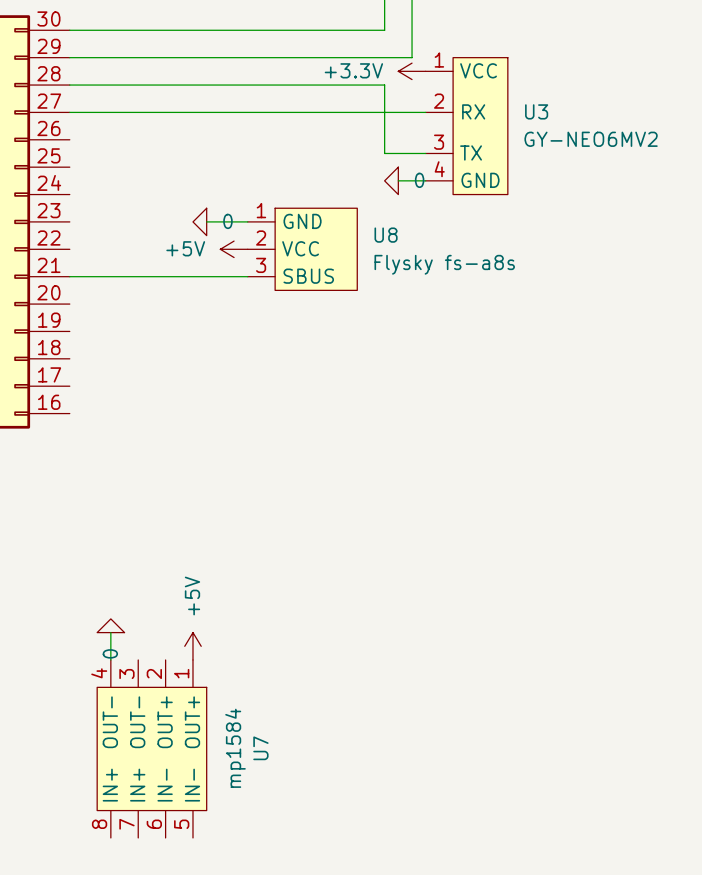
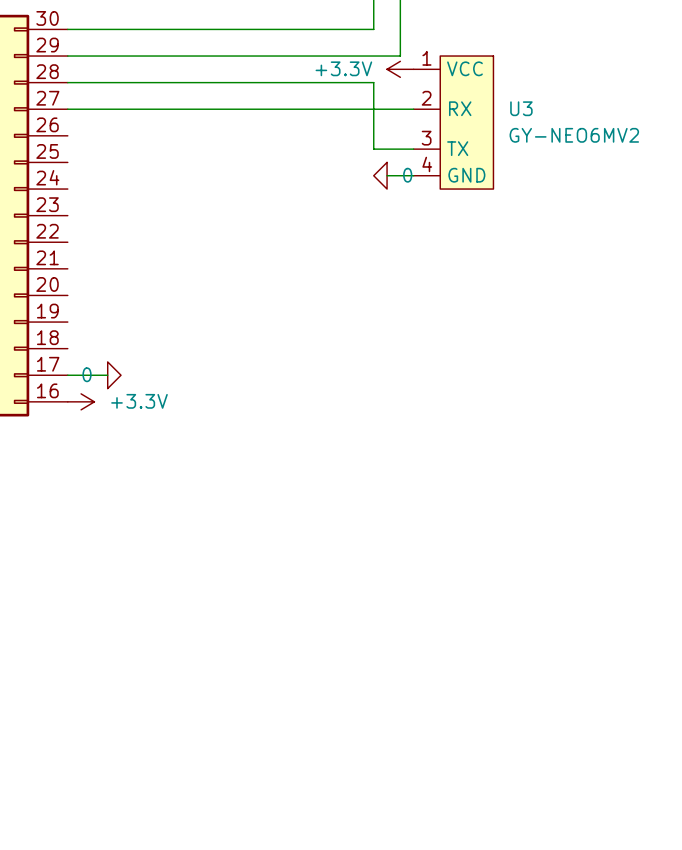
power symbol: 0 (199, 221) -> none
wire: (206, 221) (247, 221) -> (67, 375) (107, 375)
power symbol: +5V (234, 249) -> none
U8: Flysky fs-a8s (302, 249) -> none
wire: (69, 276) (247, 276) -> none
power symbol: none -> 0 (114, 375)
power symbol: none -> +3.3V (81, 401)
power symbol: 0 (110, 625) -> none
wire: (110, 632) (110, 659) -> none
power symbol: +5V (192, 646) -> none
U7: mp1584 (151, 748) -> none

